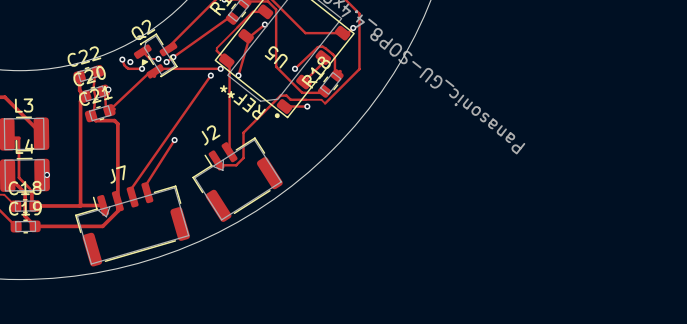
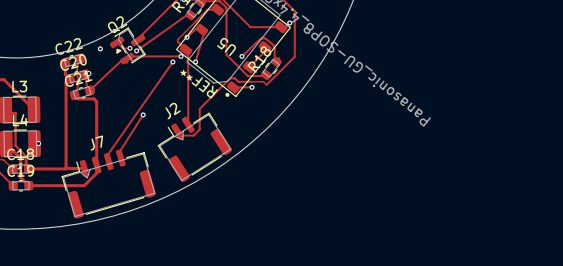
track: (264, 24) (252, 35) -> none
via: (264, 24) -> none
track: none -> (195, 29) (187, 37)
via: none -> (187, 37)
via: (173, 57) -> none
track: (122, 59) (124, 65) (128, 68) (142, 68) -> none
via: (130, 62) -> none
via: (142, 68) -> none

